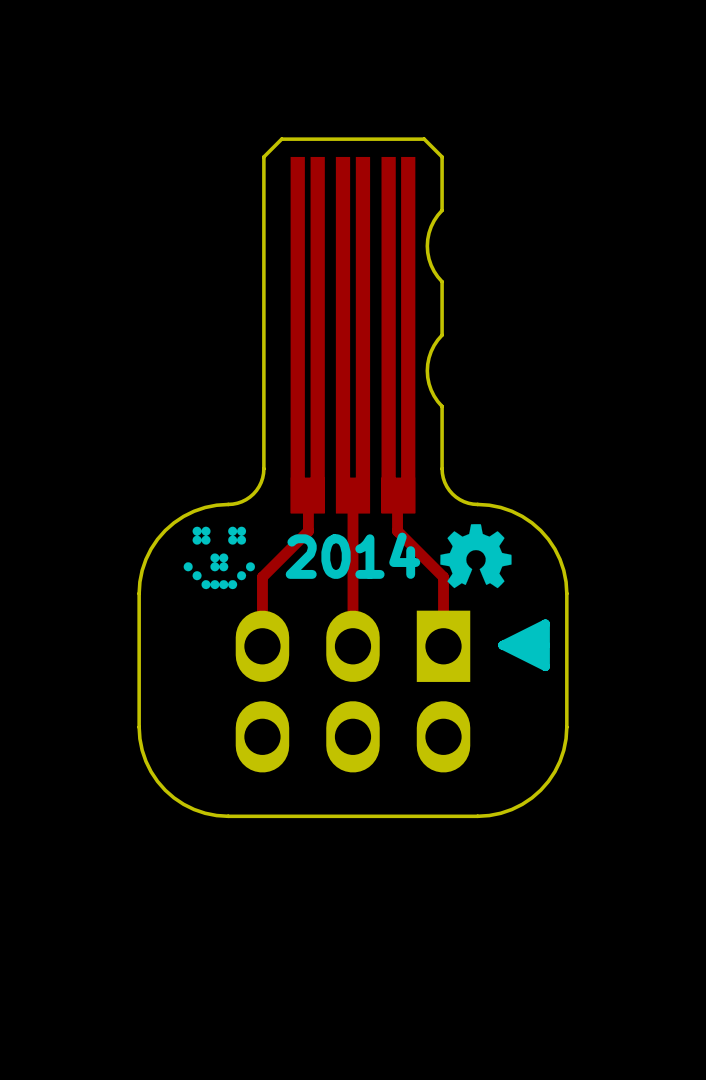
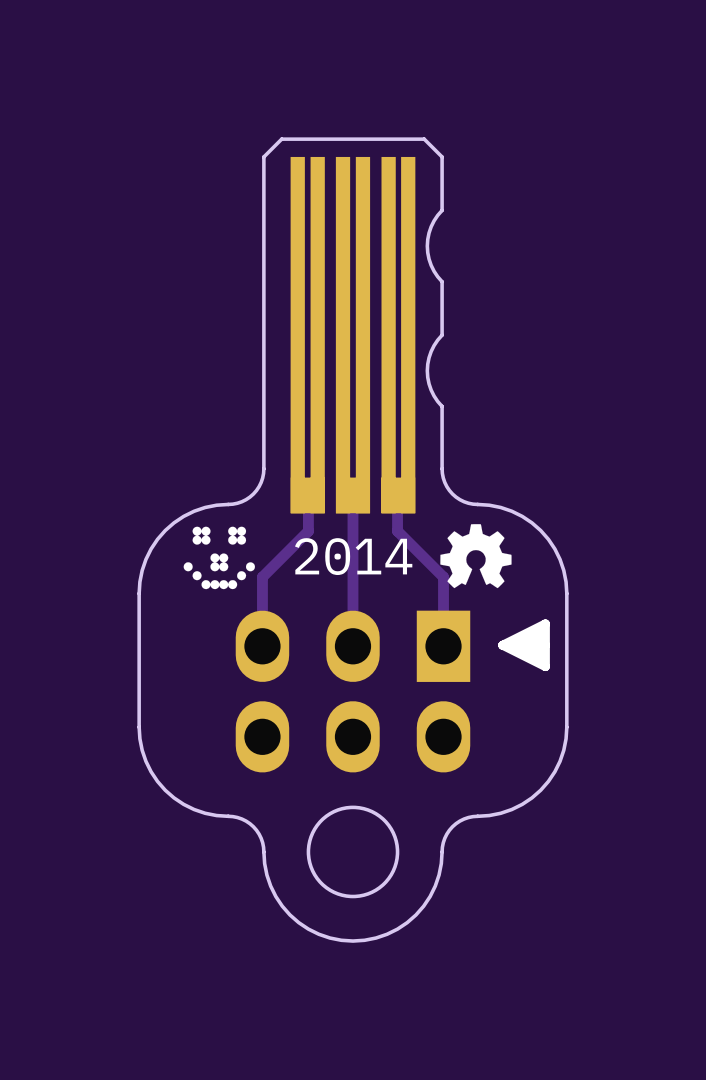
round board edge: none -> [306, 805, 400, 899]
board edge: (228, 816) (477, 816) -> (228, 816) (246, 821) (259, 834) (262, 842) (264, 863) (270, 886) (282, 906) (289, 914) (298, 922) (318, 934) (341, 940) (352, 941) (364, 940) (387, 934) (407, 922) (415, 914) (423, 906) (435, 886) (441, 863) (443, 842) (446, 834) (459, 821) (477, 816)

